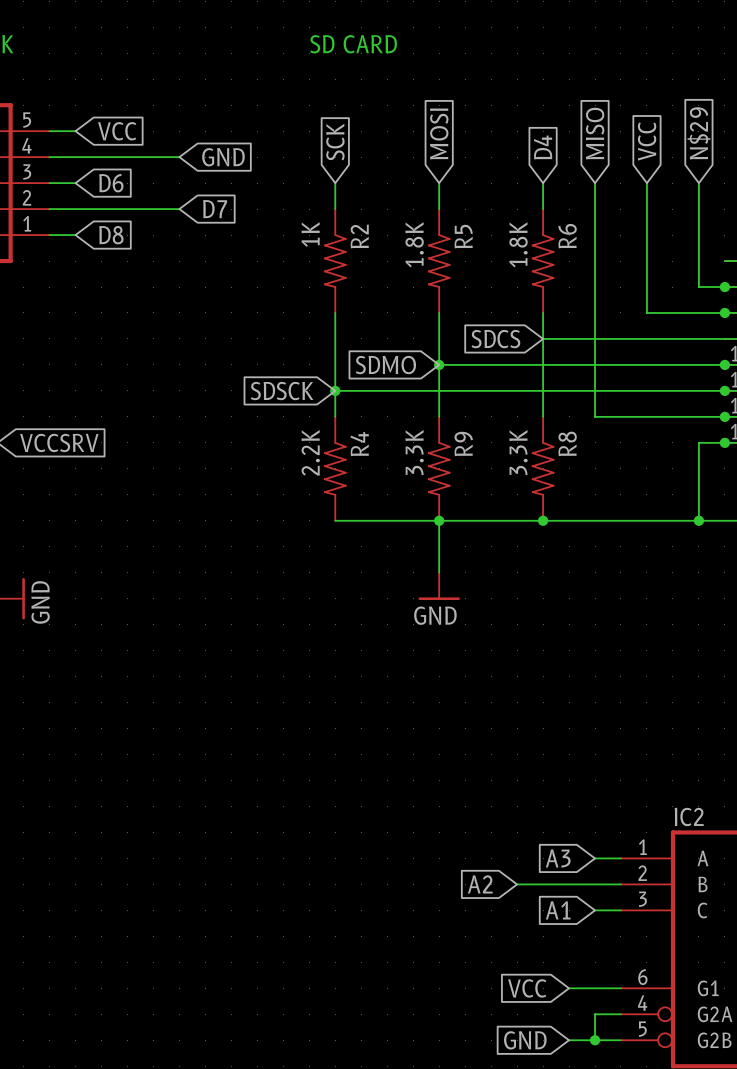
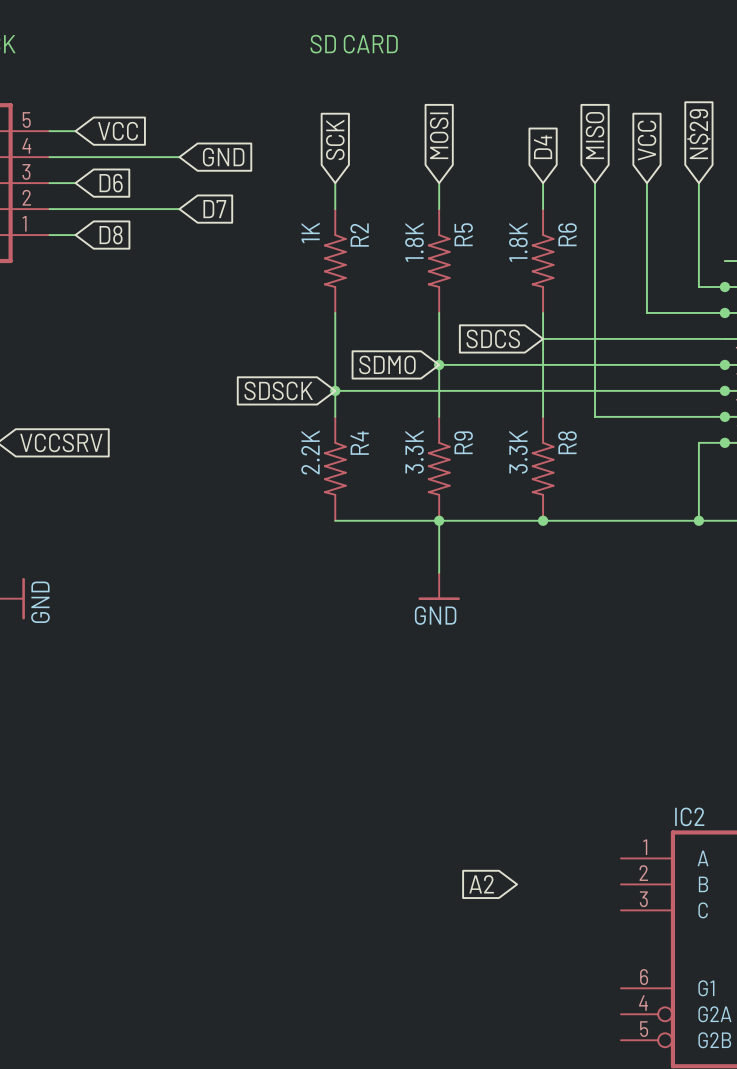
global label: A3 (558, 858) -> none
wire: (595, 858) (620, 858) -> none
wire: (517, 884) (620, 884) -> none
global label: A1 (558, 910) -> none
wire: (595, 910) (620, 910) -> none
global label: VCC (527, 988) -> none
wire: (569, 988) (620, 988) -> none
wire: (620, 1014) (595, 1014) (595, 1040) -> none
global label: GND (525, 1040) -> none
wire: (569, 1040) (620, 1040) -> none
junction: (595, 1040) -> none

